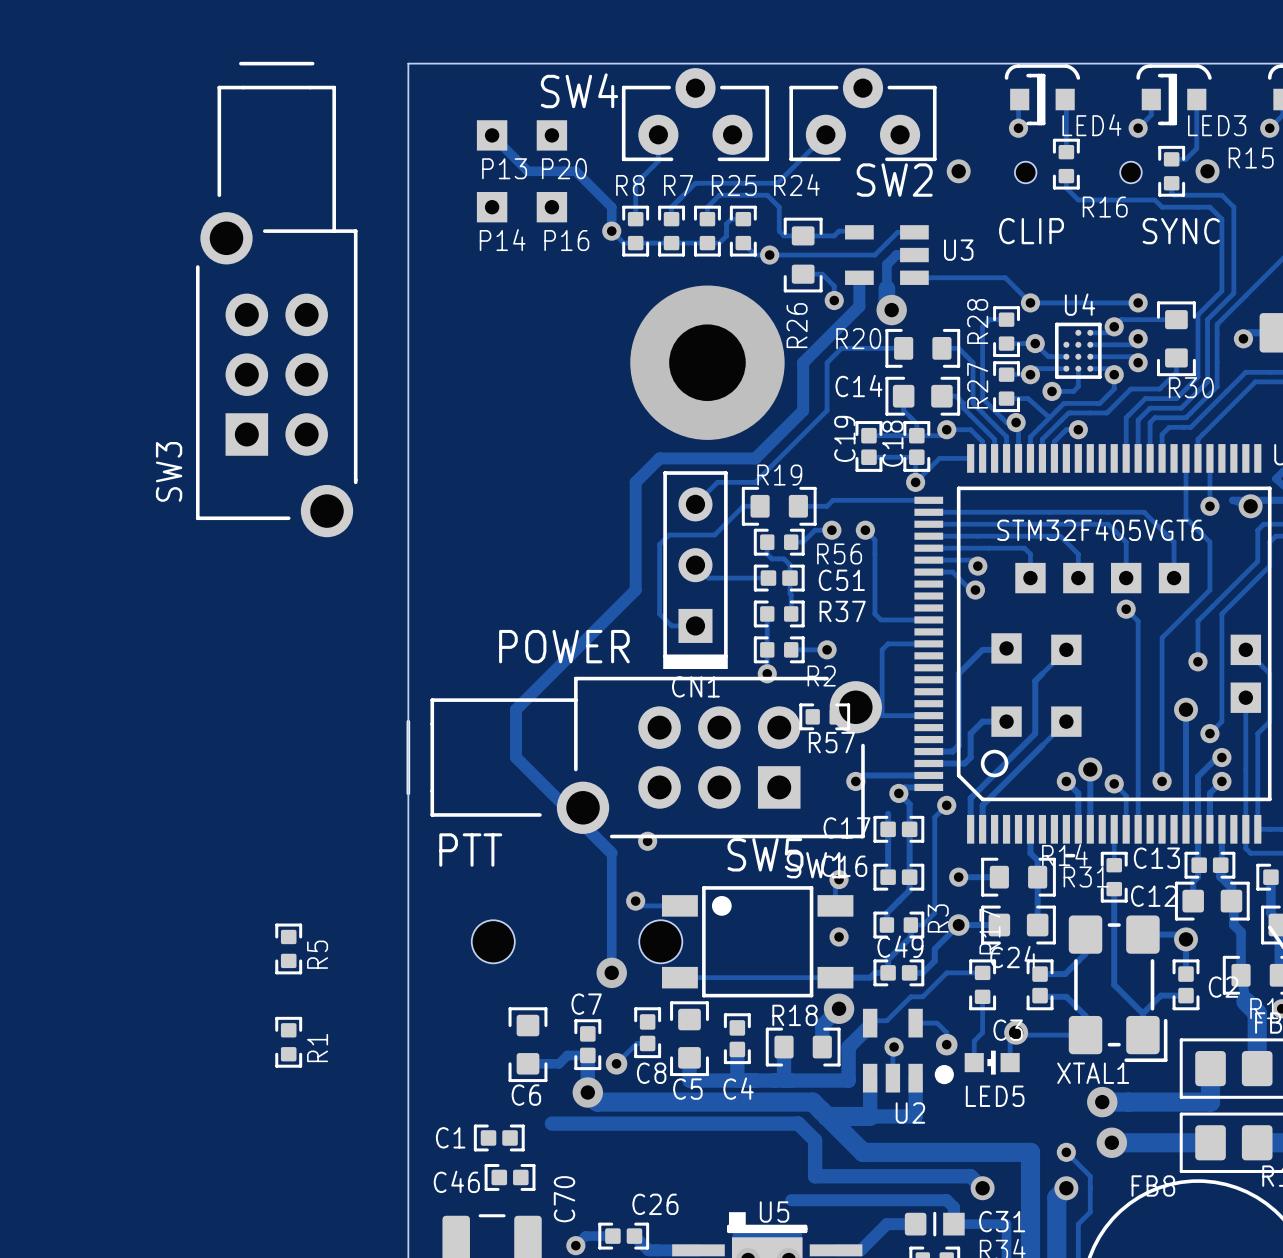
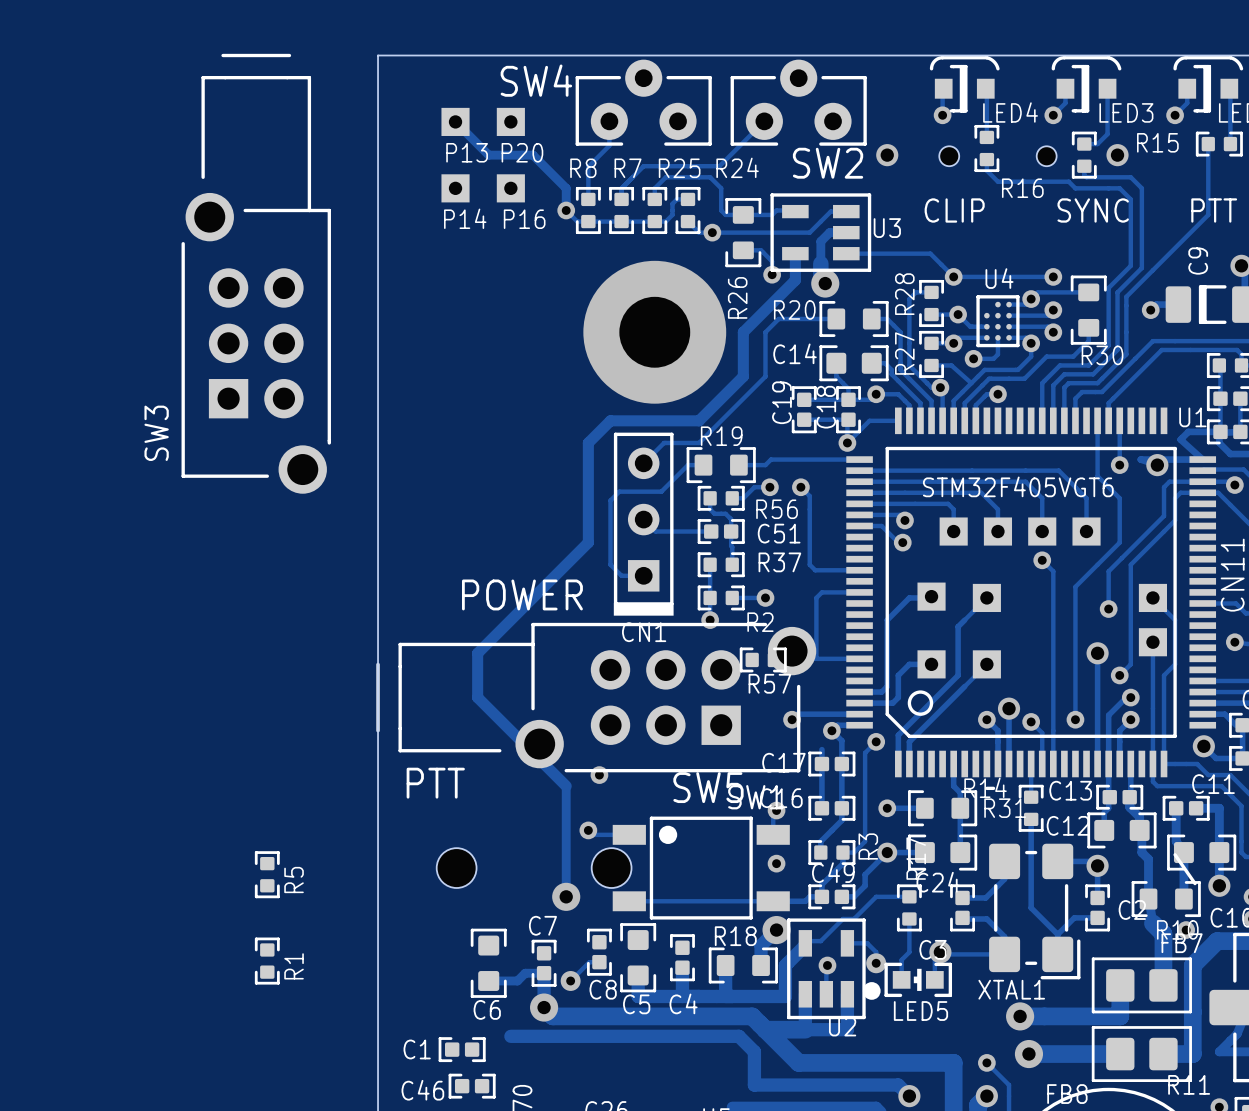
U3 footprint: [845, 225, 929, 285] -> [770, 193, 872, 272]
U2 footprint: [862, 1008, 923, 1093] -> [787, 918, 866, 1020]
LED5 footprint: [934, 1050, 1020, 1085] -> [862, 962, 953, 1000]

